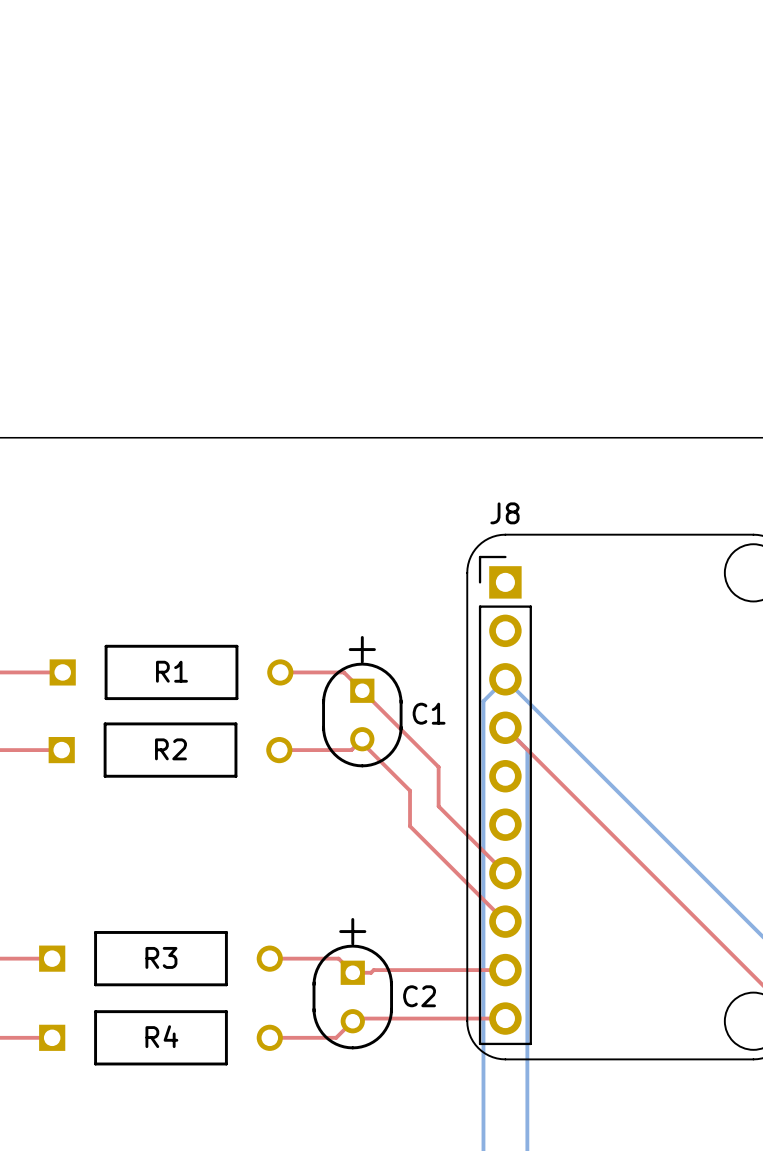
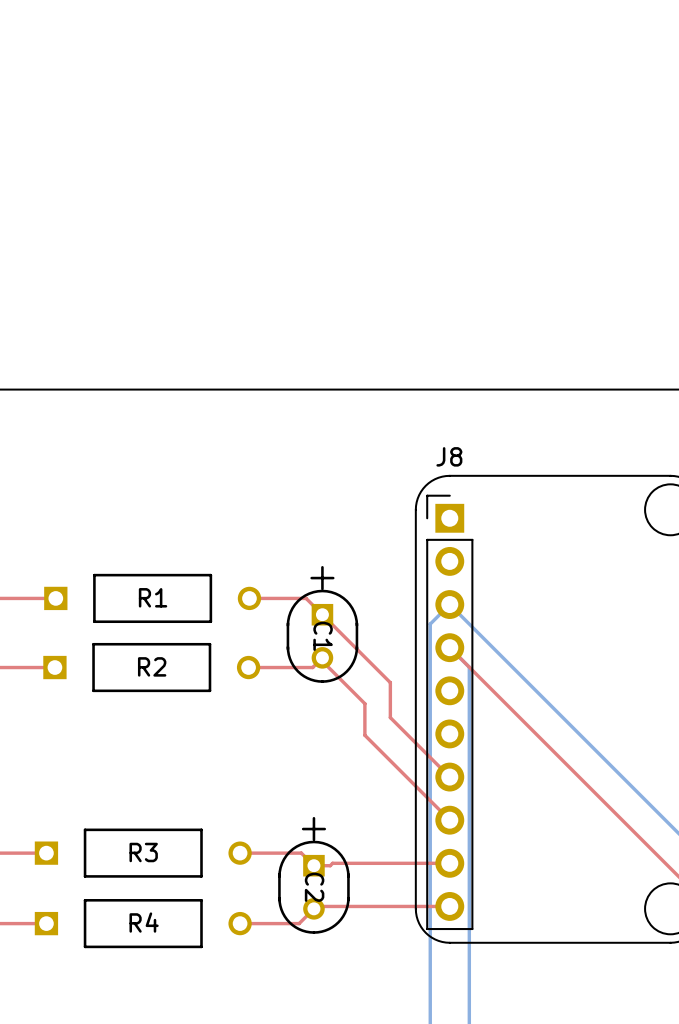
C1 name rotation: 0° (429, 713) -> 90° clockwise (323, 636)
C1 name position: C1 (429, 713) -> C1 (323, 636)
C2 name rotation: 0° (419, 996) -> 90° clockwise (314, 887)
C2 name position: C2 (419, 996) -> C2 (314, 887)

